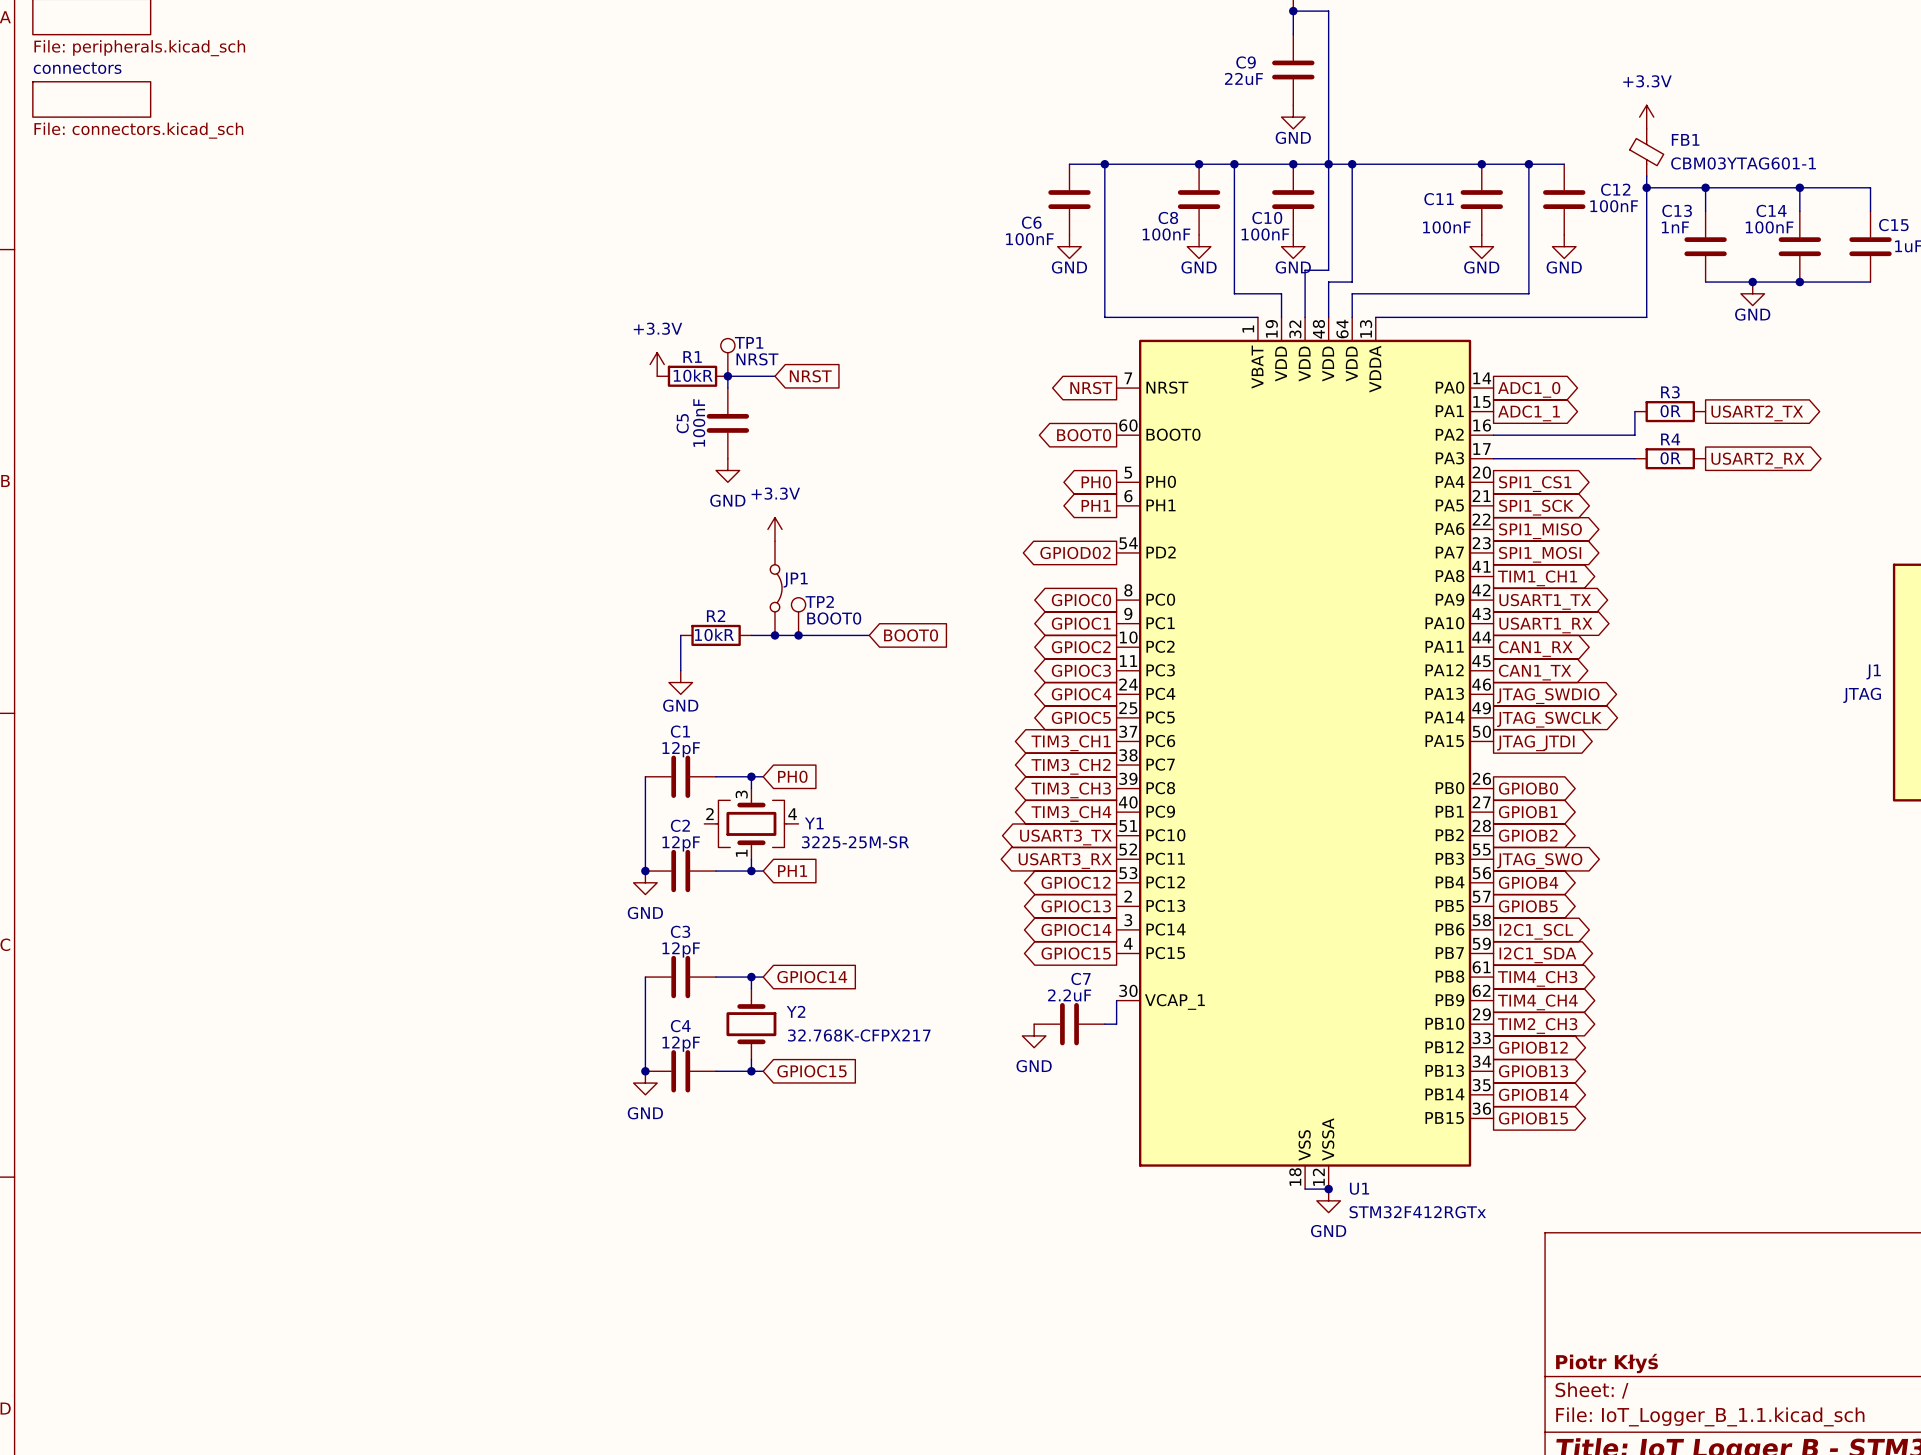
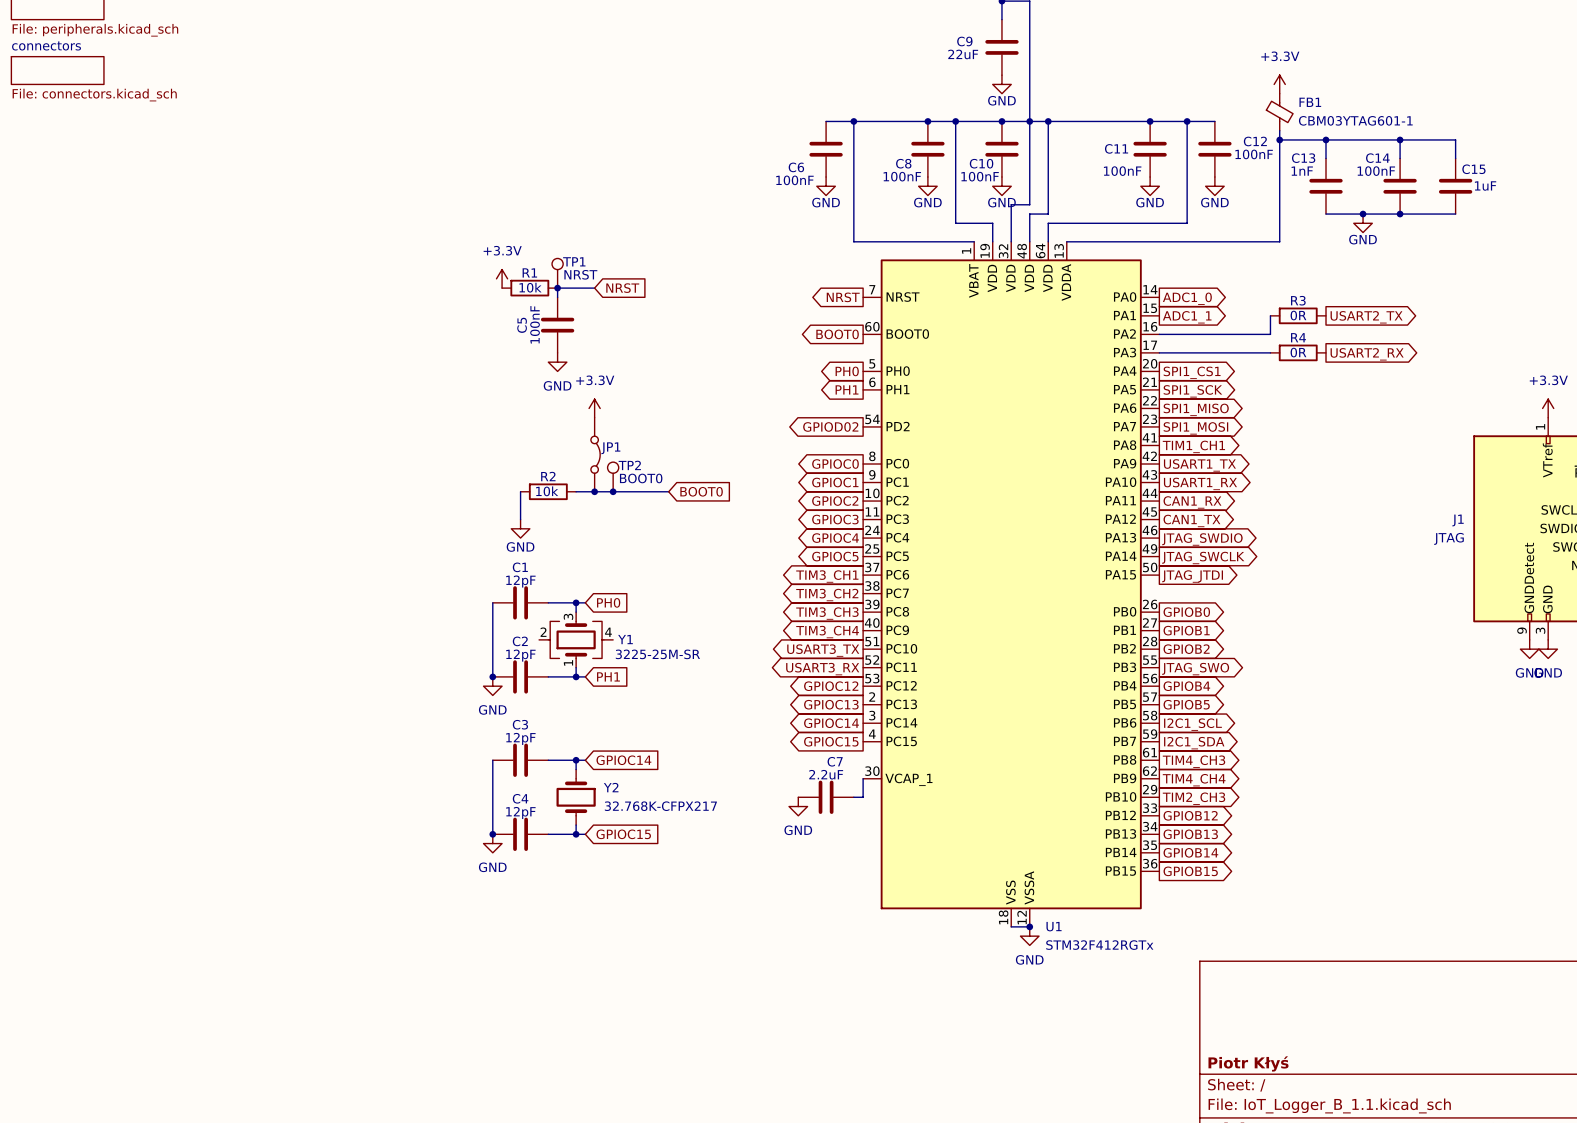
R1 value: 10kR (693, 375) -> 10k (530, 287)
R2 value: 10kR (714, 634) -> 10k (547, 491)

